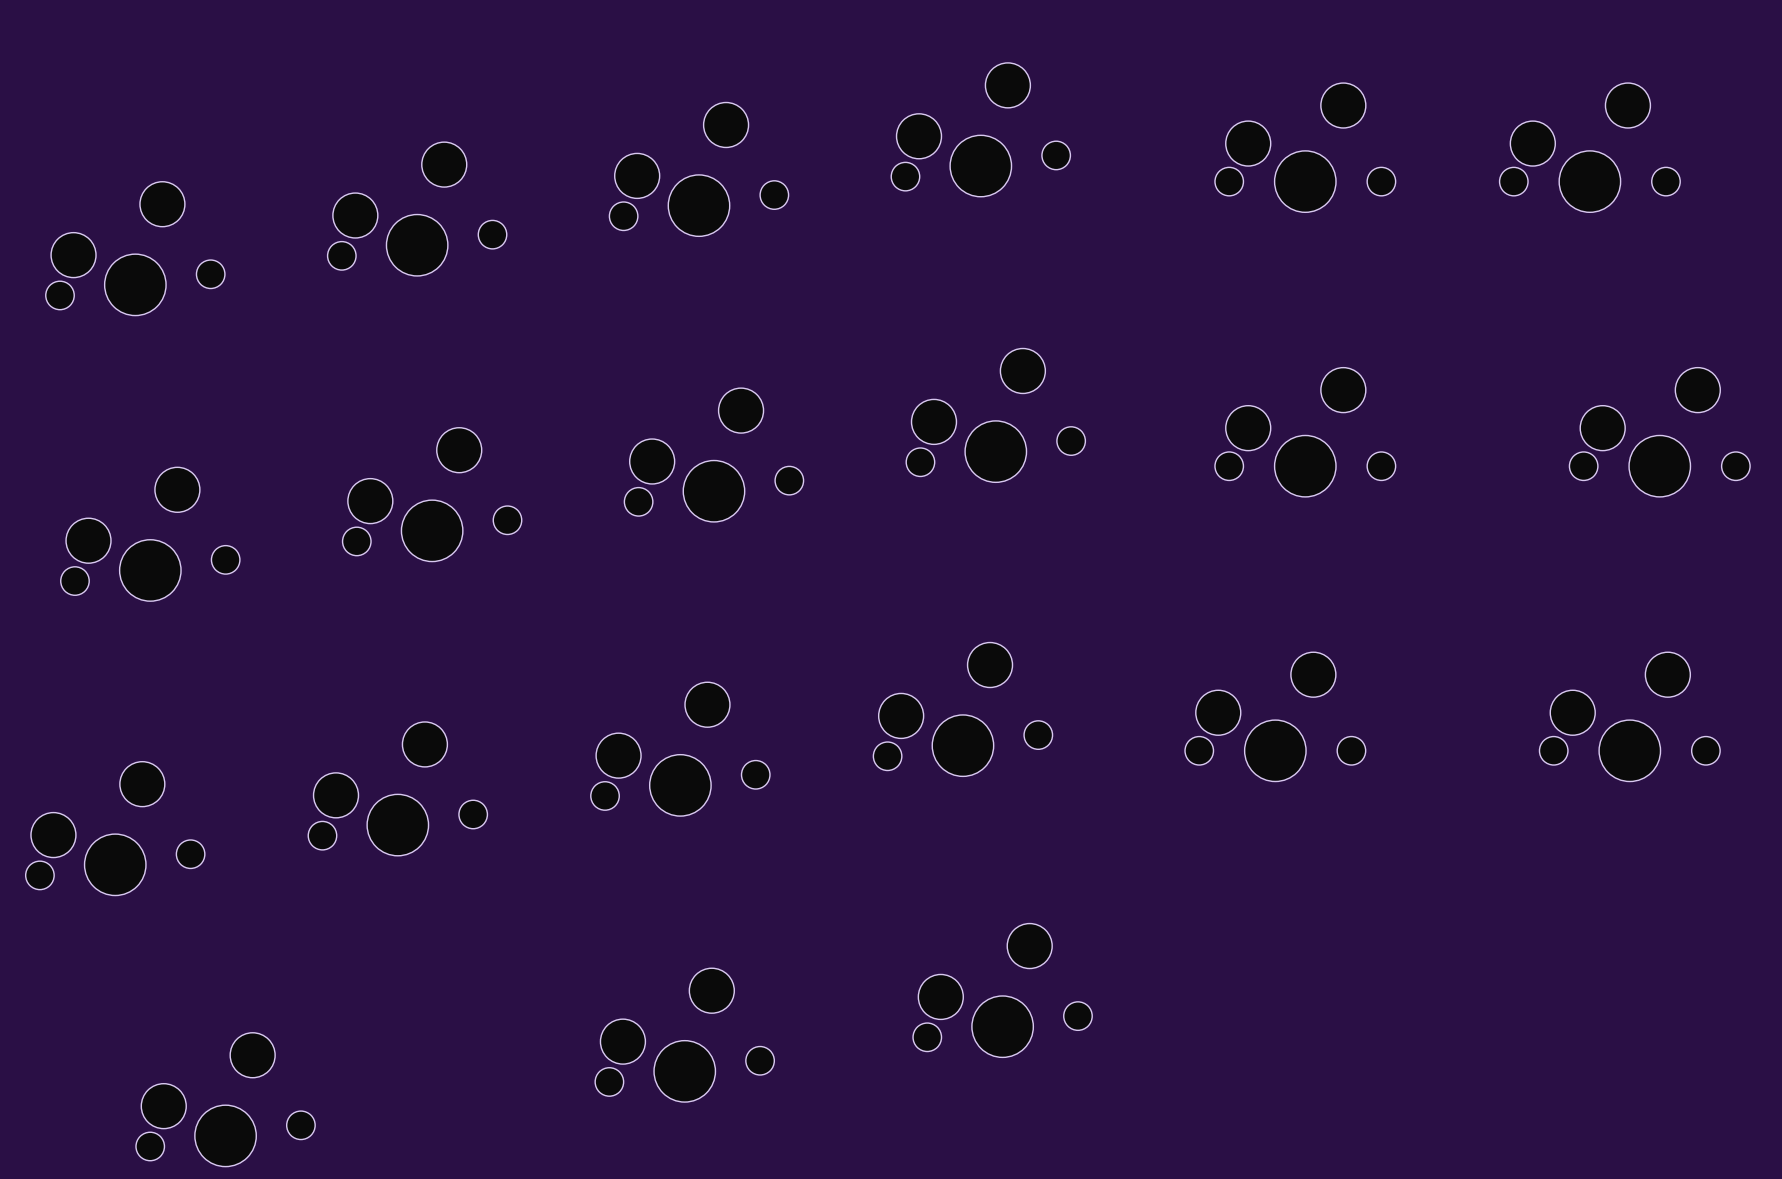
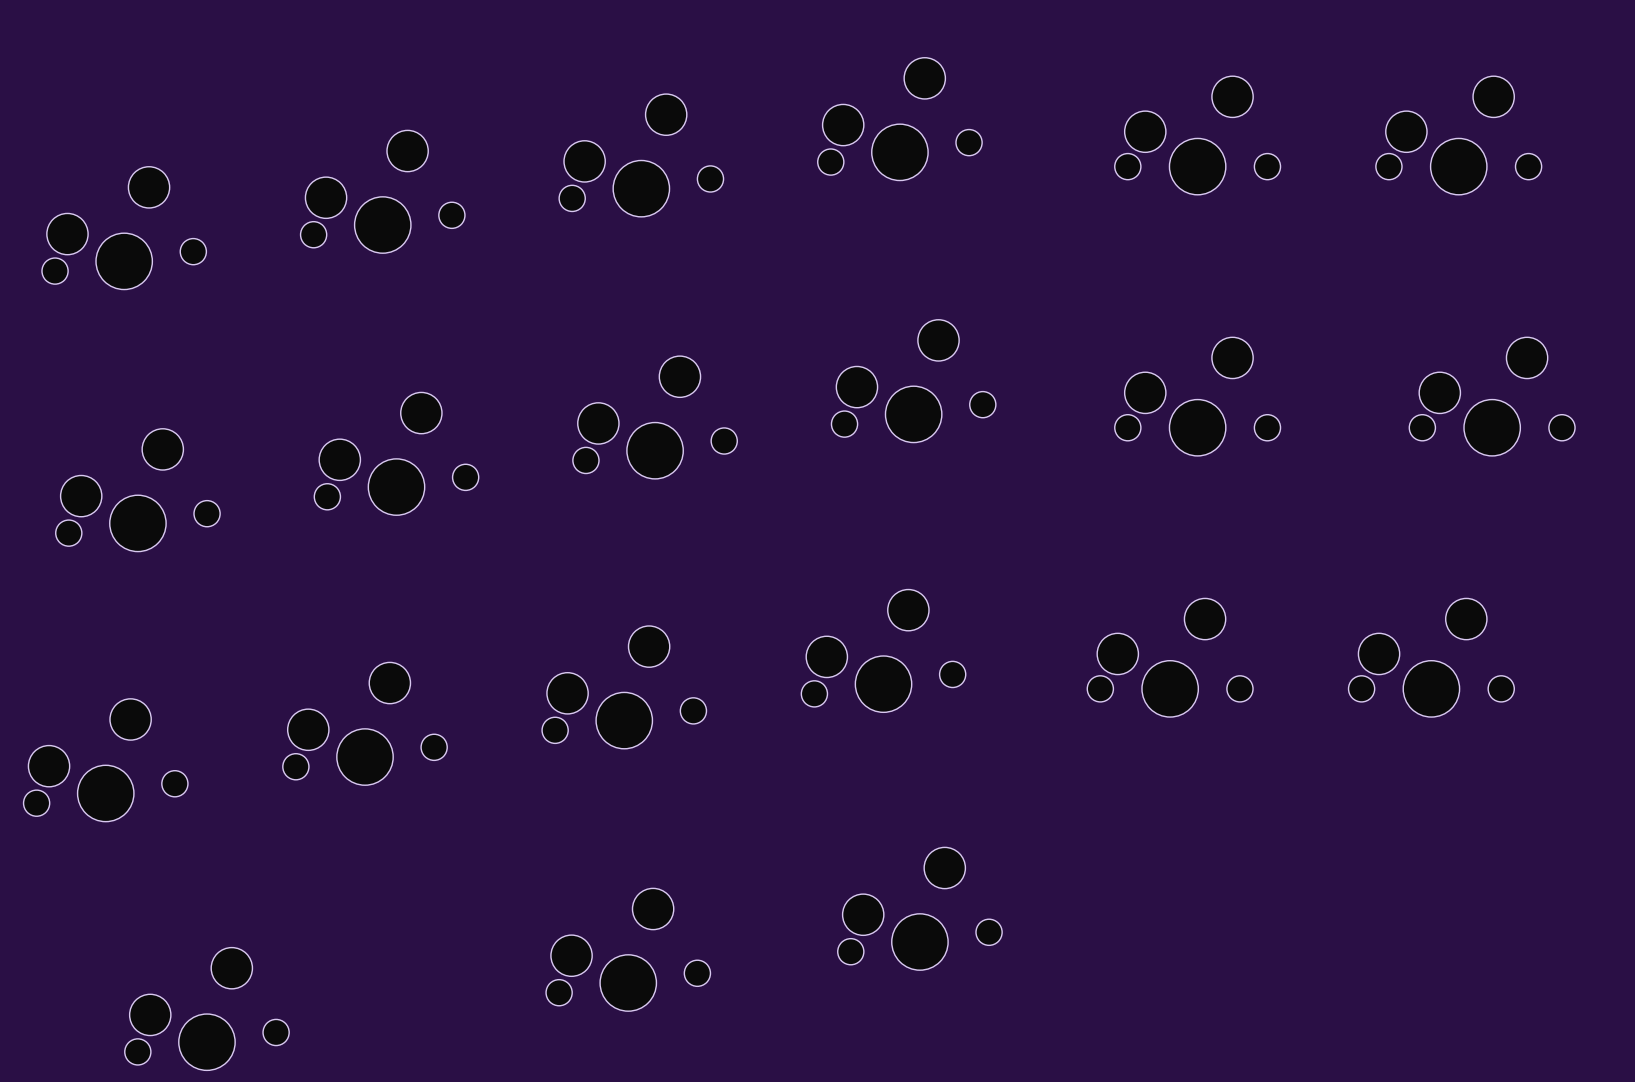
part position: (1659, 432) -> (1492, 396)
part position: (1629, 716) -> (1431, 657)

